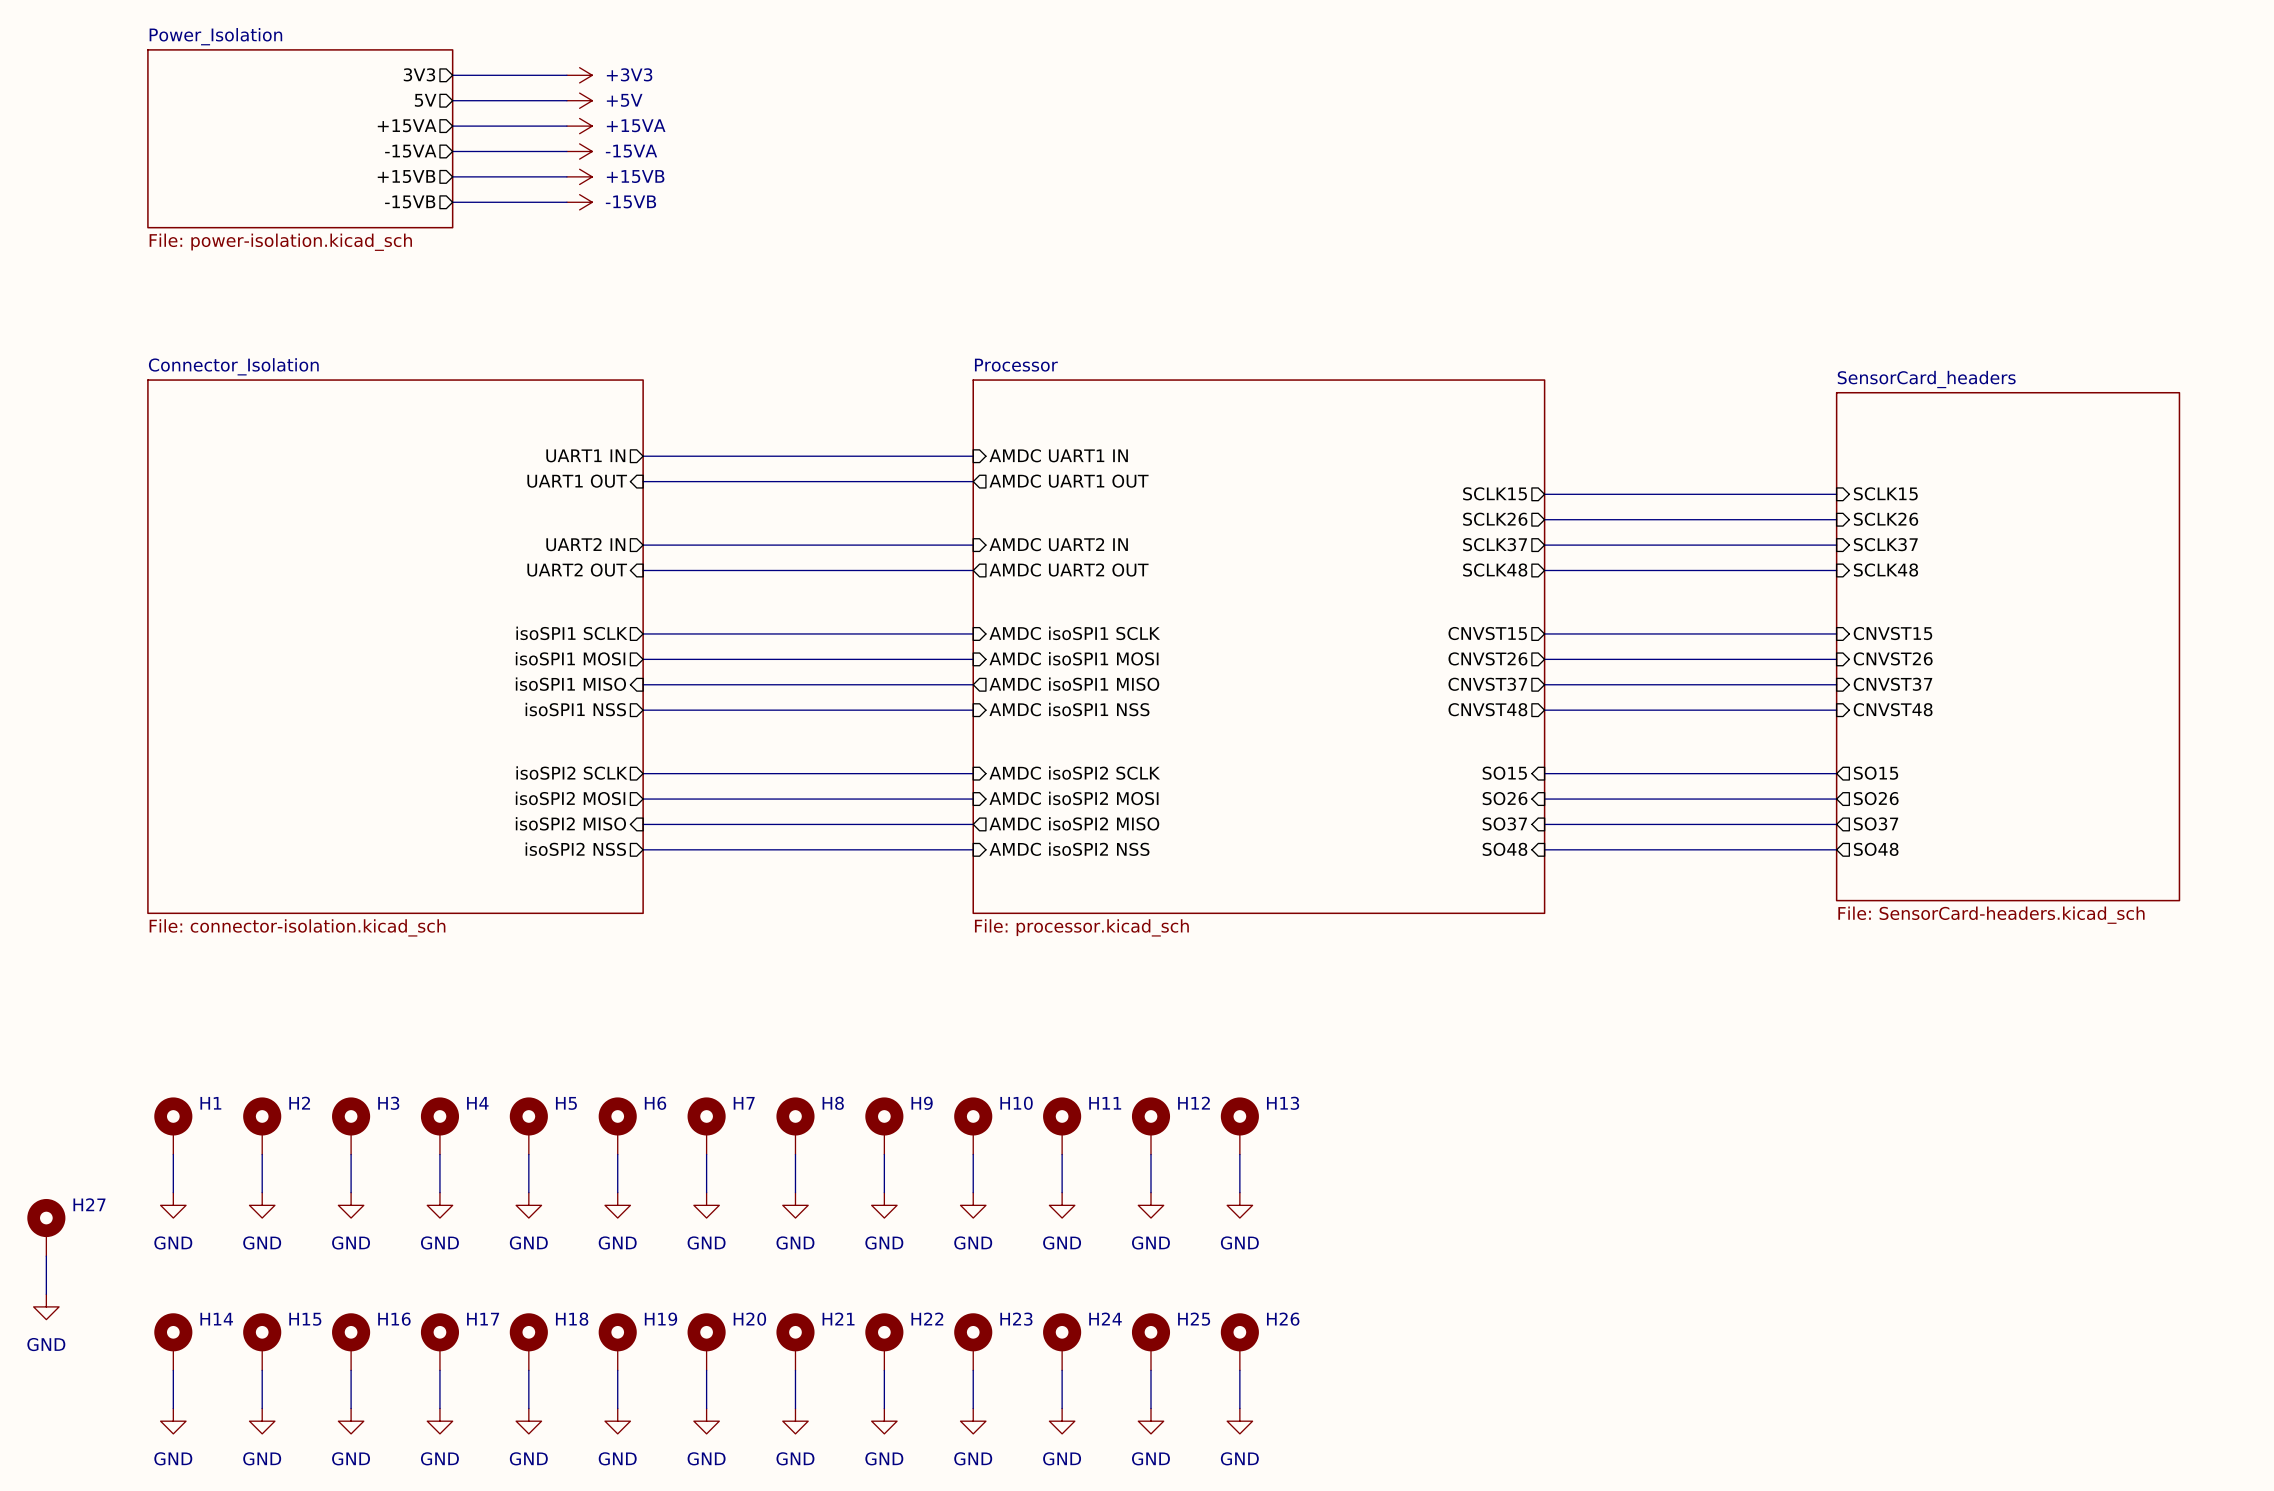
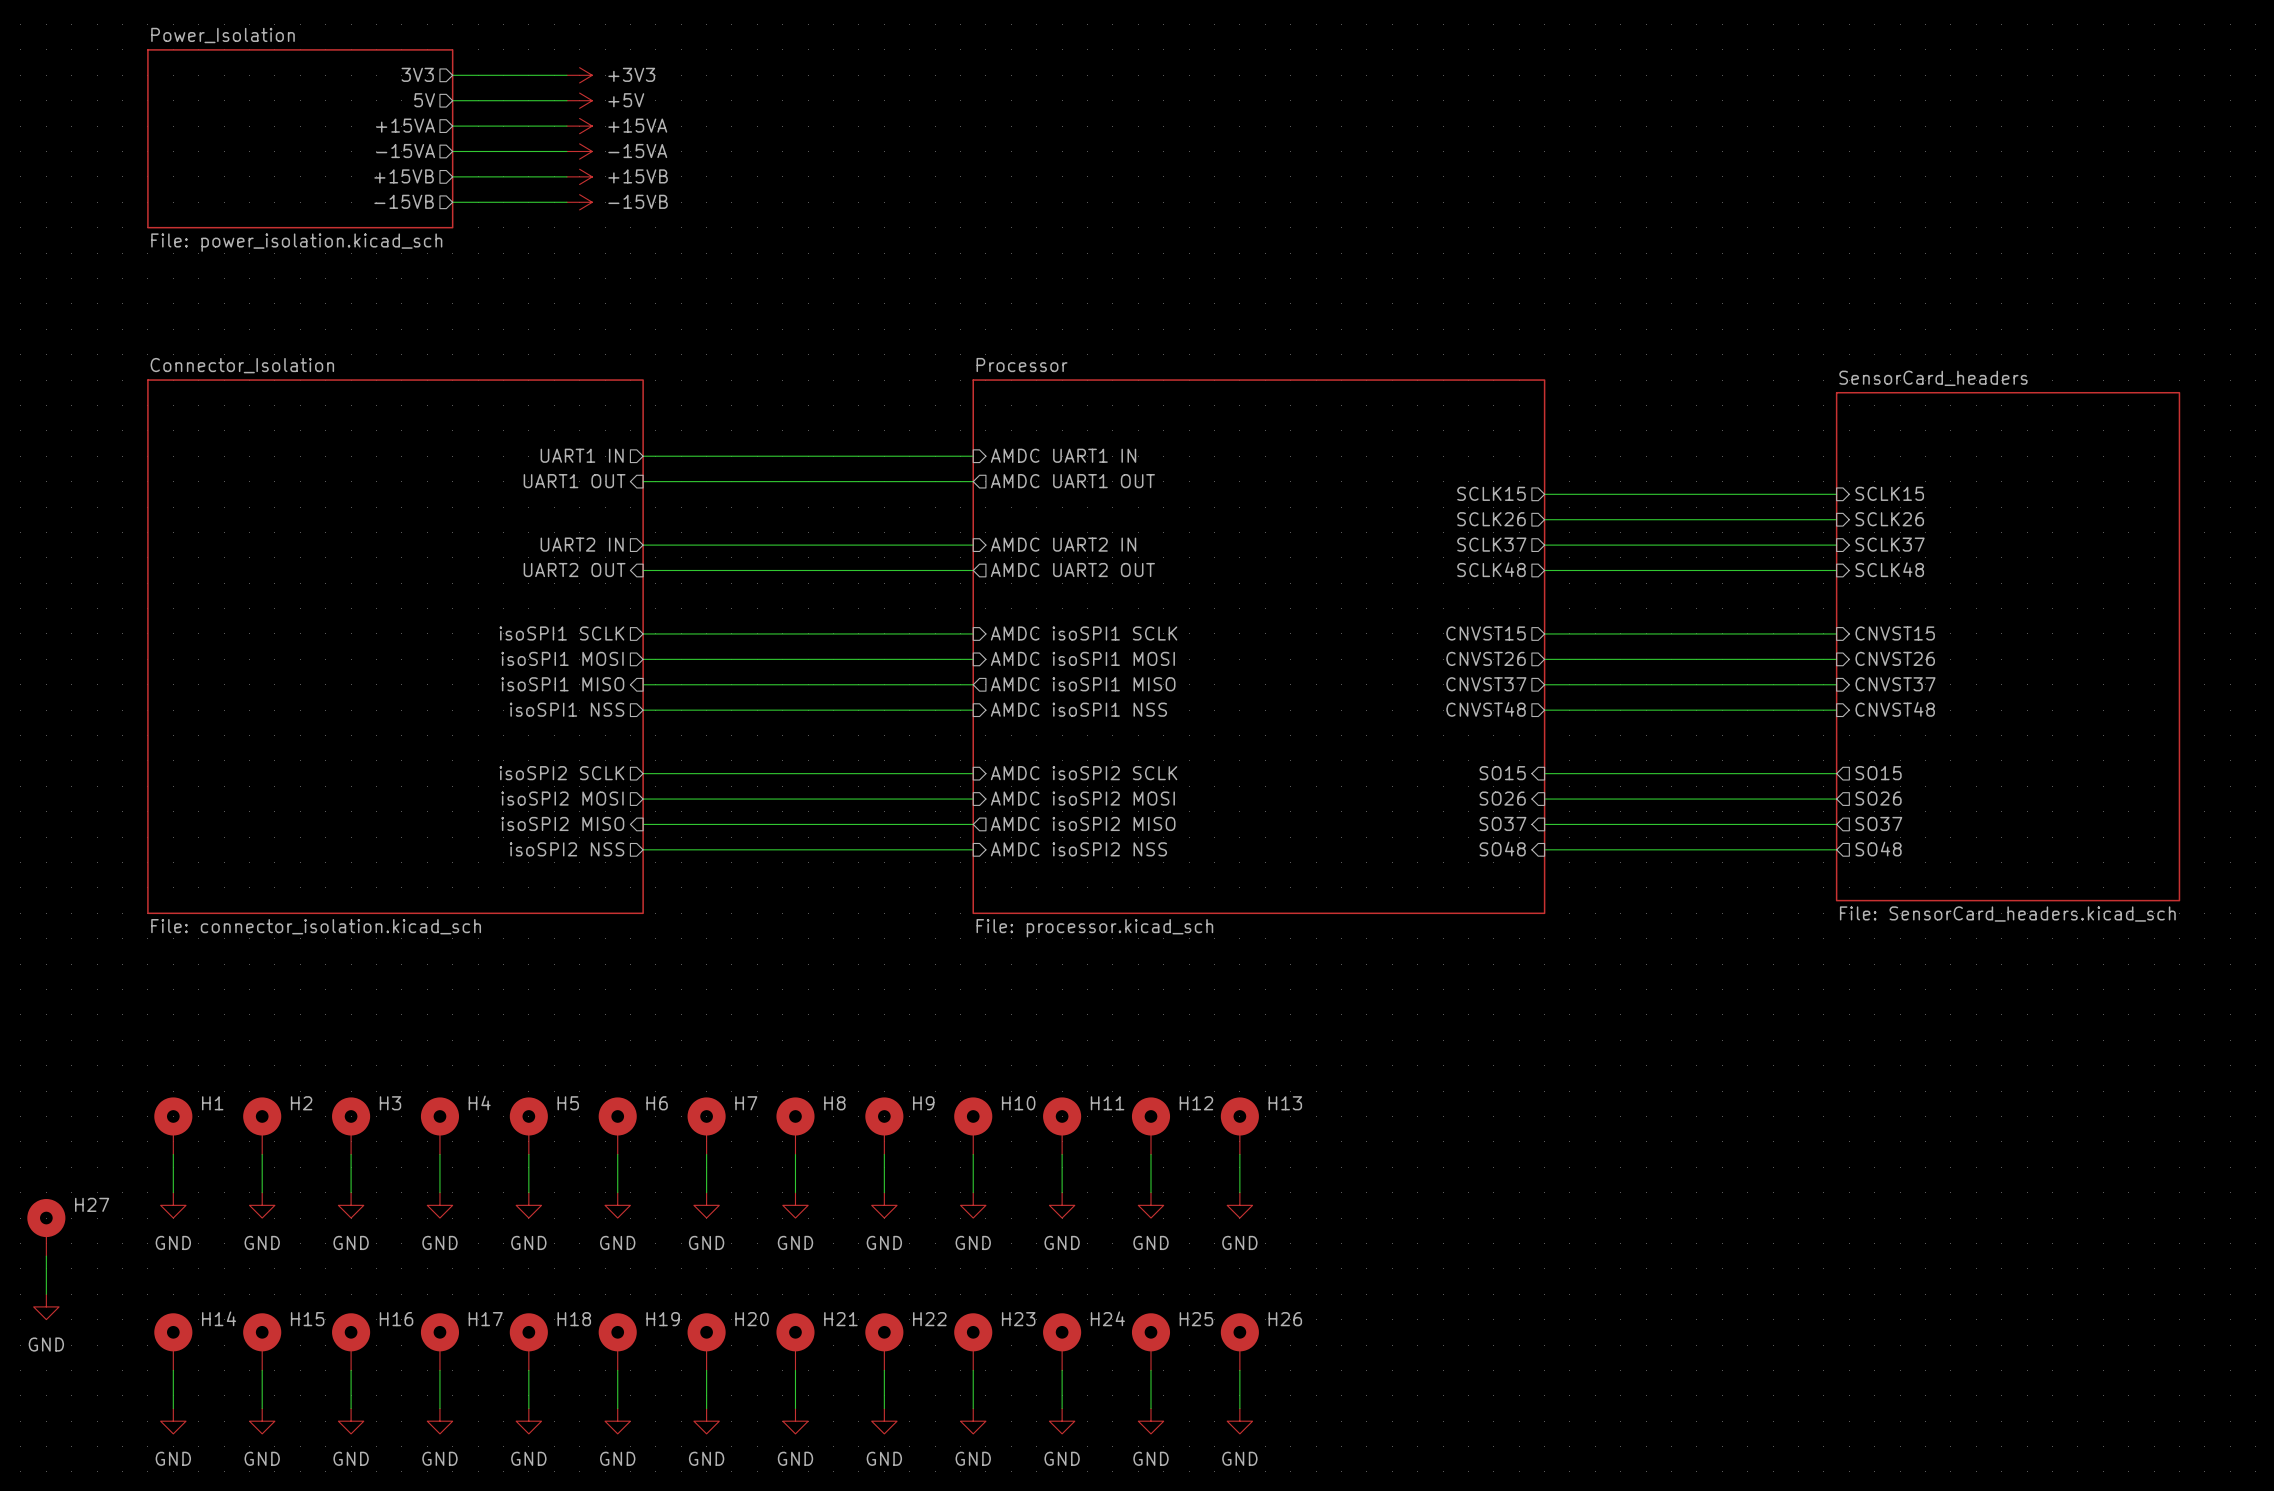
sheet Power_Isolation value: File: power-isolation.kicad_sch (280, 242) -> File: power_isolation.kicad_sch (296, 242)
sheet SensorCard_headers value: File: SensorCard-headers.kicad_sch (1991, 915) -> File: SensorCard_headers.kicad_sch (2007, 914)
sheet Connector_Isolation value: File: connector-isolation.kicad_sch (297, 927) -> File: connector_isolation.kicad_sch (316, 926)

